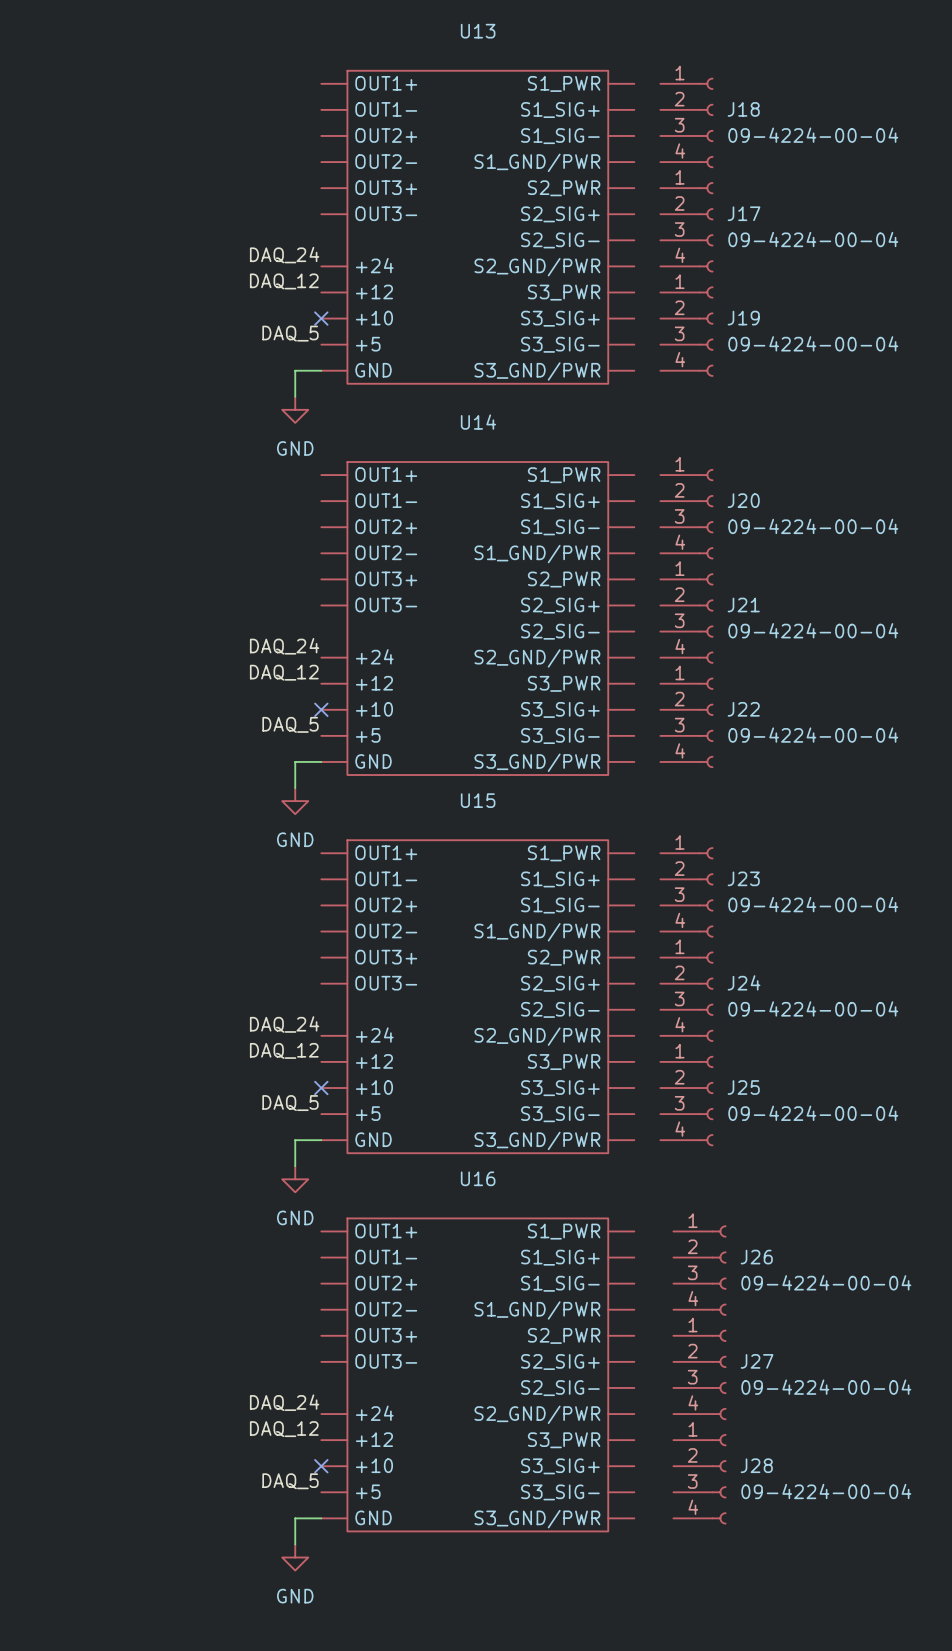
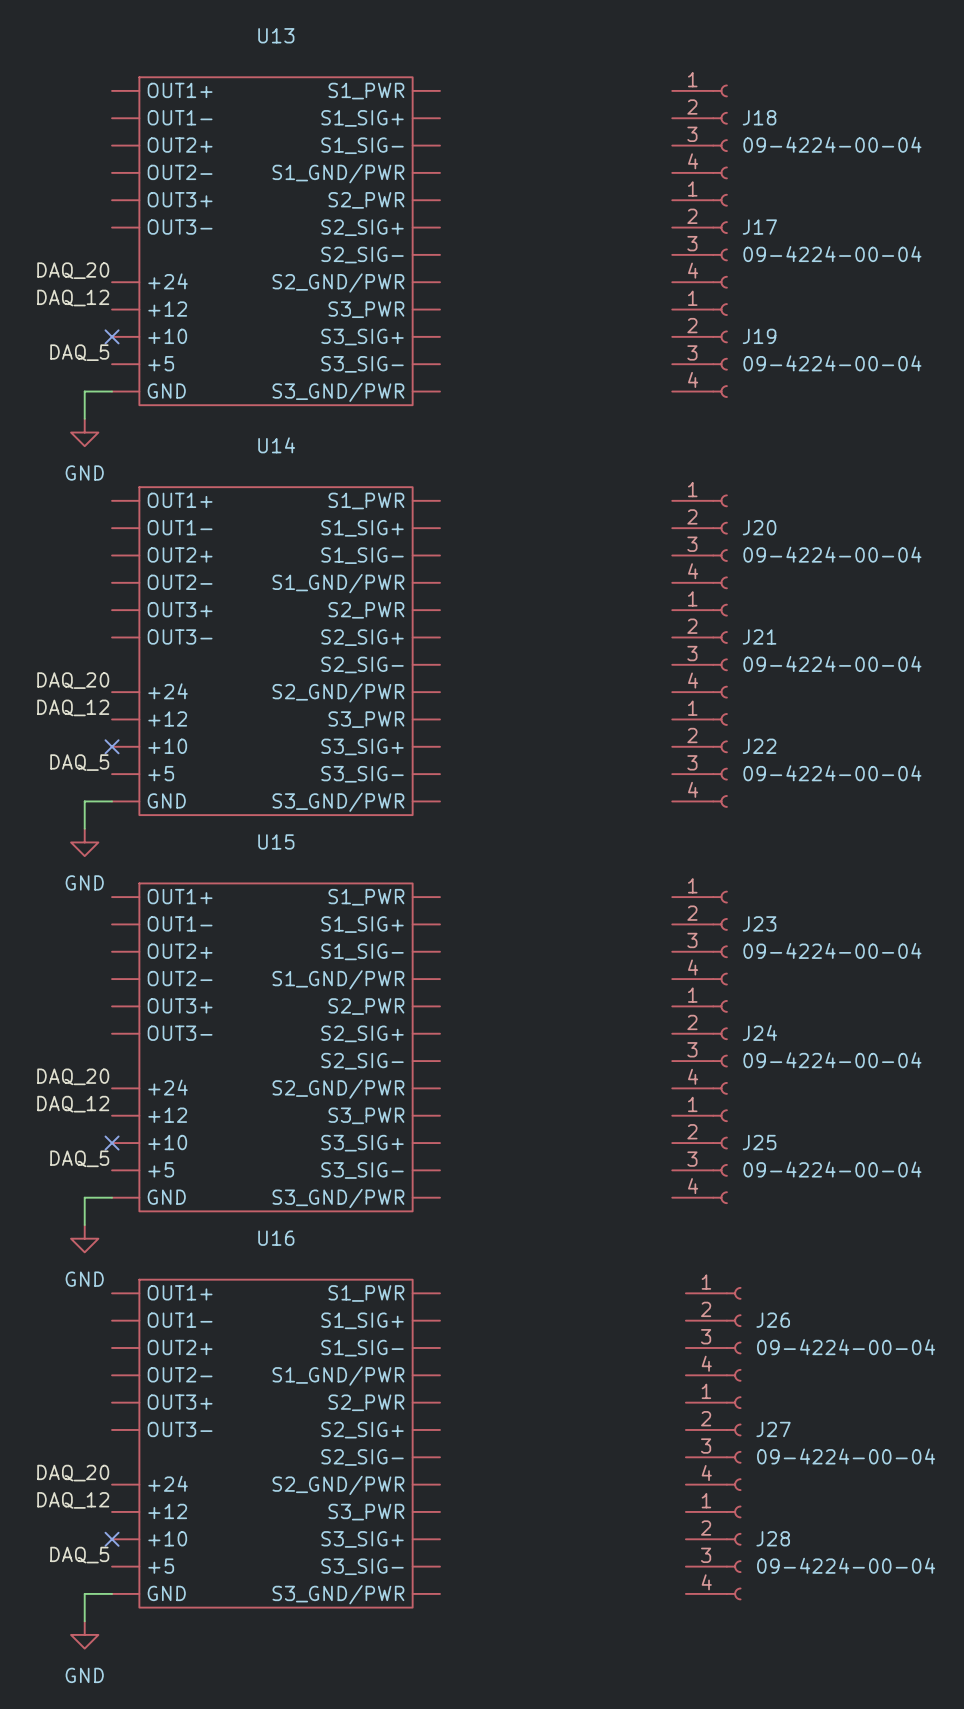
U13 position: (477, 227) -> (276, 241)
label: none -> DAQ_20 (73, 270)
label: DAQ_24 (284, 255) -> none
label position: DAQ_12 (284, 281) -> DAQ_12 (73, 298)
no-connect mark: none -> (112, 336)
no-connect mark: (321, 318) -> none
label position: DAQ_5 (290, 333) -> DAQ_5 (79, 352)
wire: (321, 370) (295, 370) (295, 396) -> (112, 391) (84, 391) (84, 418)
power symbol position: GND (295, 409) -> GND (84, 432)
U14 position: (477, 618) -> (276, 651)
label: none -> DAQ_20 (73, 680)
label: DAQ_24 (284, 646) -> none
label position: DAQ_12 (284, 672) -> DAQ_12 (73, 707)
no-connect mark: none -> (112, 746)
no-connect mark: (321, 709) -> none
label position: DAQ_5 (290, 724) -> DAQ_5 (79, 762)
wire: (321, 761) (295, 761) (295, 788) -> (112, 801) (84, 801) (84, 828)
power symbol position: GND (295, 801) -> GND (84, 842)
U15 position: (477, 996) -> (276, 1047)
label: none -> DAQ_20 (73, 1076)
label: DAQ_24 (284, 1024) -> none
label position: DAQ_12 (284, 1050) -> DAQ_12 (73, 1104)
no-connect mark: none -> (112, 1143)
no-connect mark: (321, 1088) -> none
label position: DAQ_5 (290, 1103) -> DAQ_5 (79, 1158)
wire: (321, 1140) (295, 1140) (295, 1166) -> (112, 1197) (84, 1197) (84, 1225)
power symbol position: GND (295, 1179) -> GND (84, 1238)
U16 position: (477, 1374) -> (276, 1443)
label: DAQ_24 (284, 1402) -> none
label: none -> DAQ_20 (73, 1473)
label position: DAQ_12 (284, 1429) -> DAQ_12 (73, 1500)
no-connect mark: none -> (112, 1539)
no-connect mark: (321, 1466) -> none
label position: DAQ_5 (290, 1481) -> DAQ_5 (79, 1555)
wire: (321, 1518) (295, 1518) (295, 1544) -> (112, 1593) (84, 1593) (84, 1621)
power symbol position: GND (295, 1557) -> GND (84, 1634)

